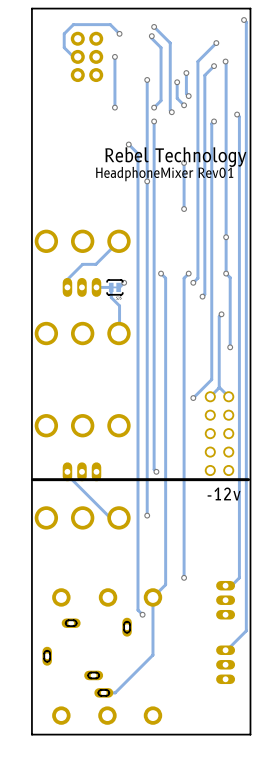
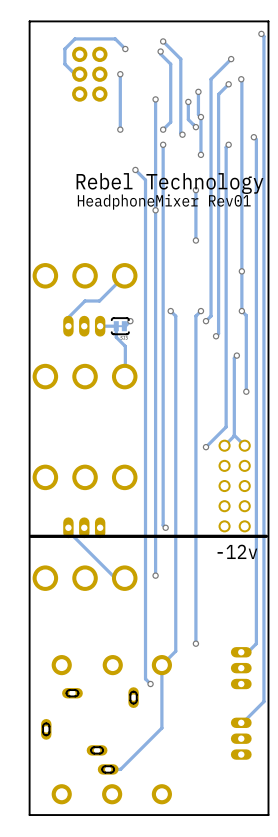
track: none -> (200, 117) (200, 154)
via: none -> (200, 154)

